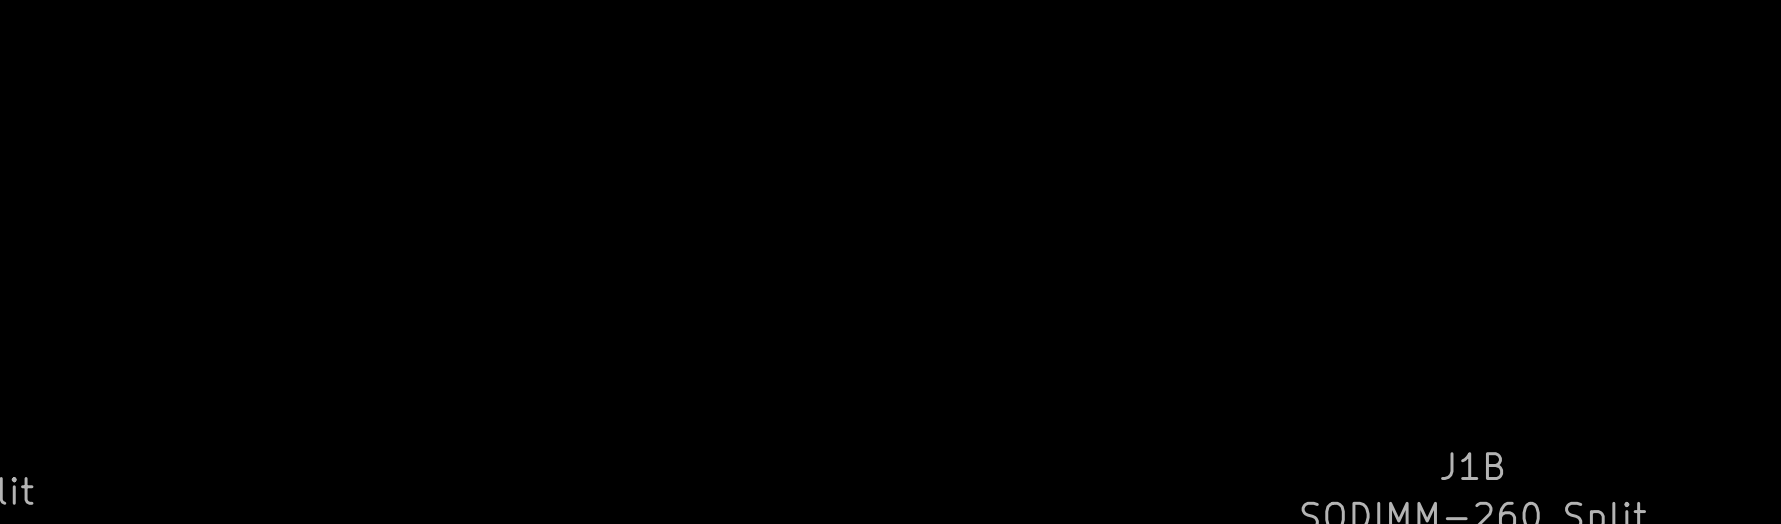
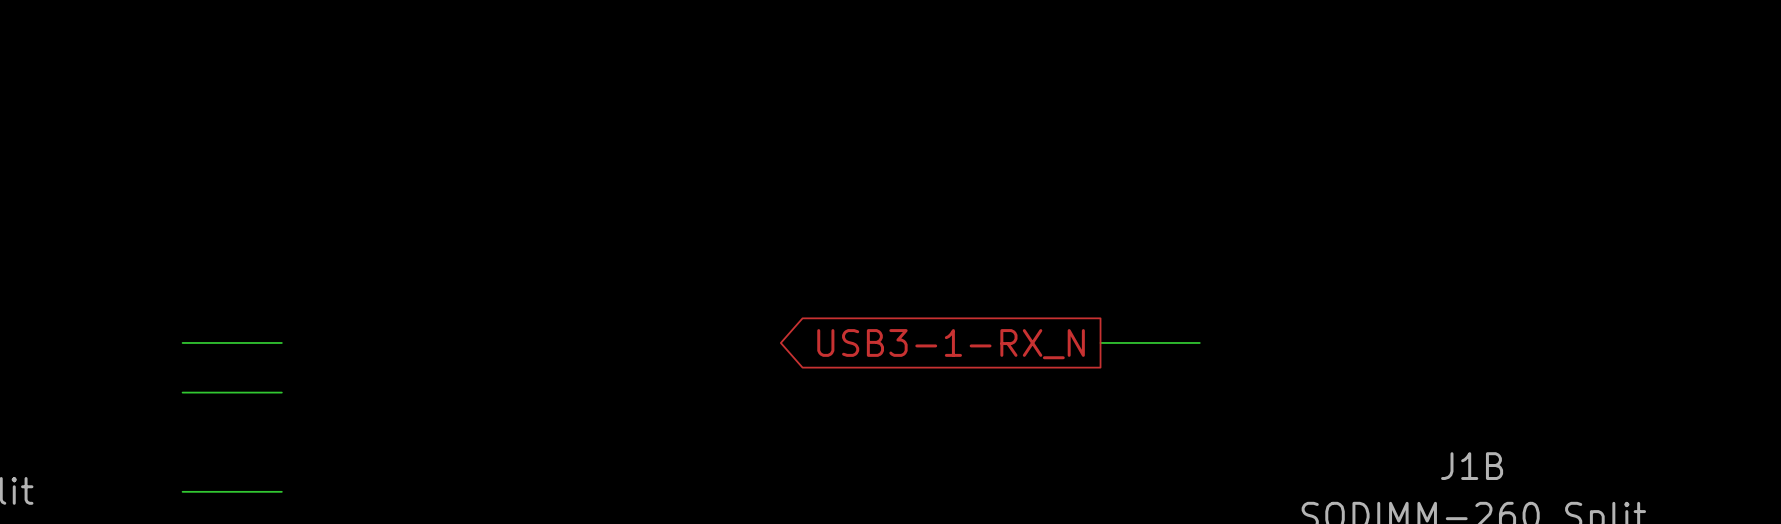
wire: none -> (182, 342) (281, 342)
wire: none -> (1100, 342) (1199, 342)
global label: none -> USB3-1-RX_N (951, 344)
wire: none -> (182, 392) (281, 392)
wire: none -> (182, 491) (281, 491)

